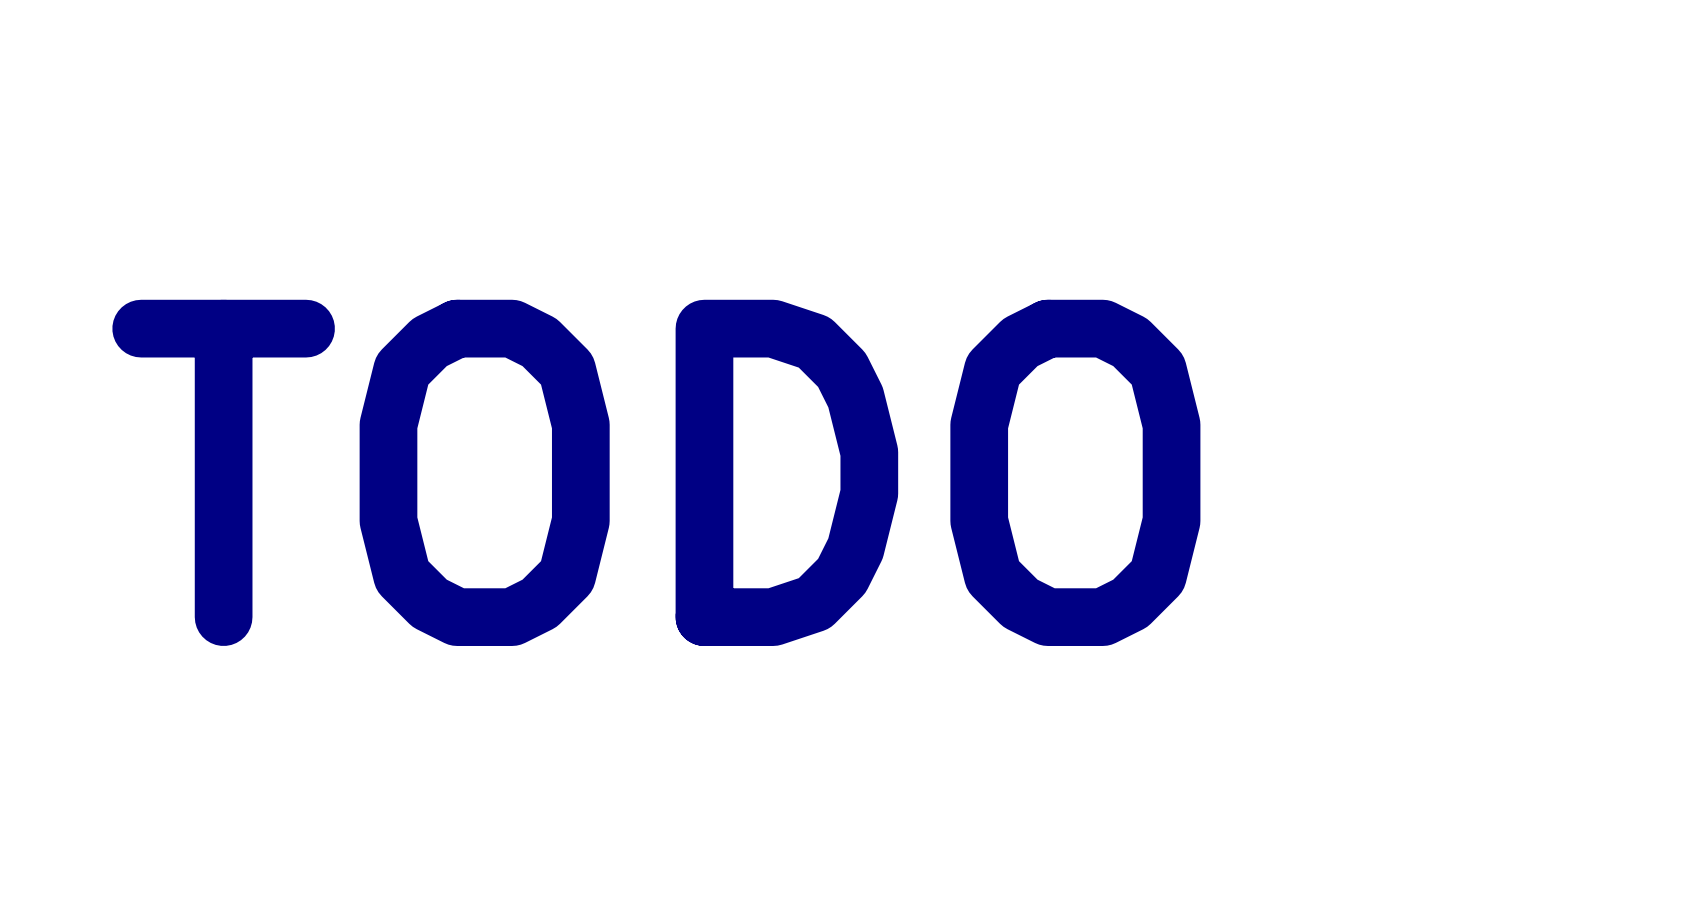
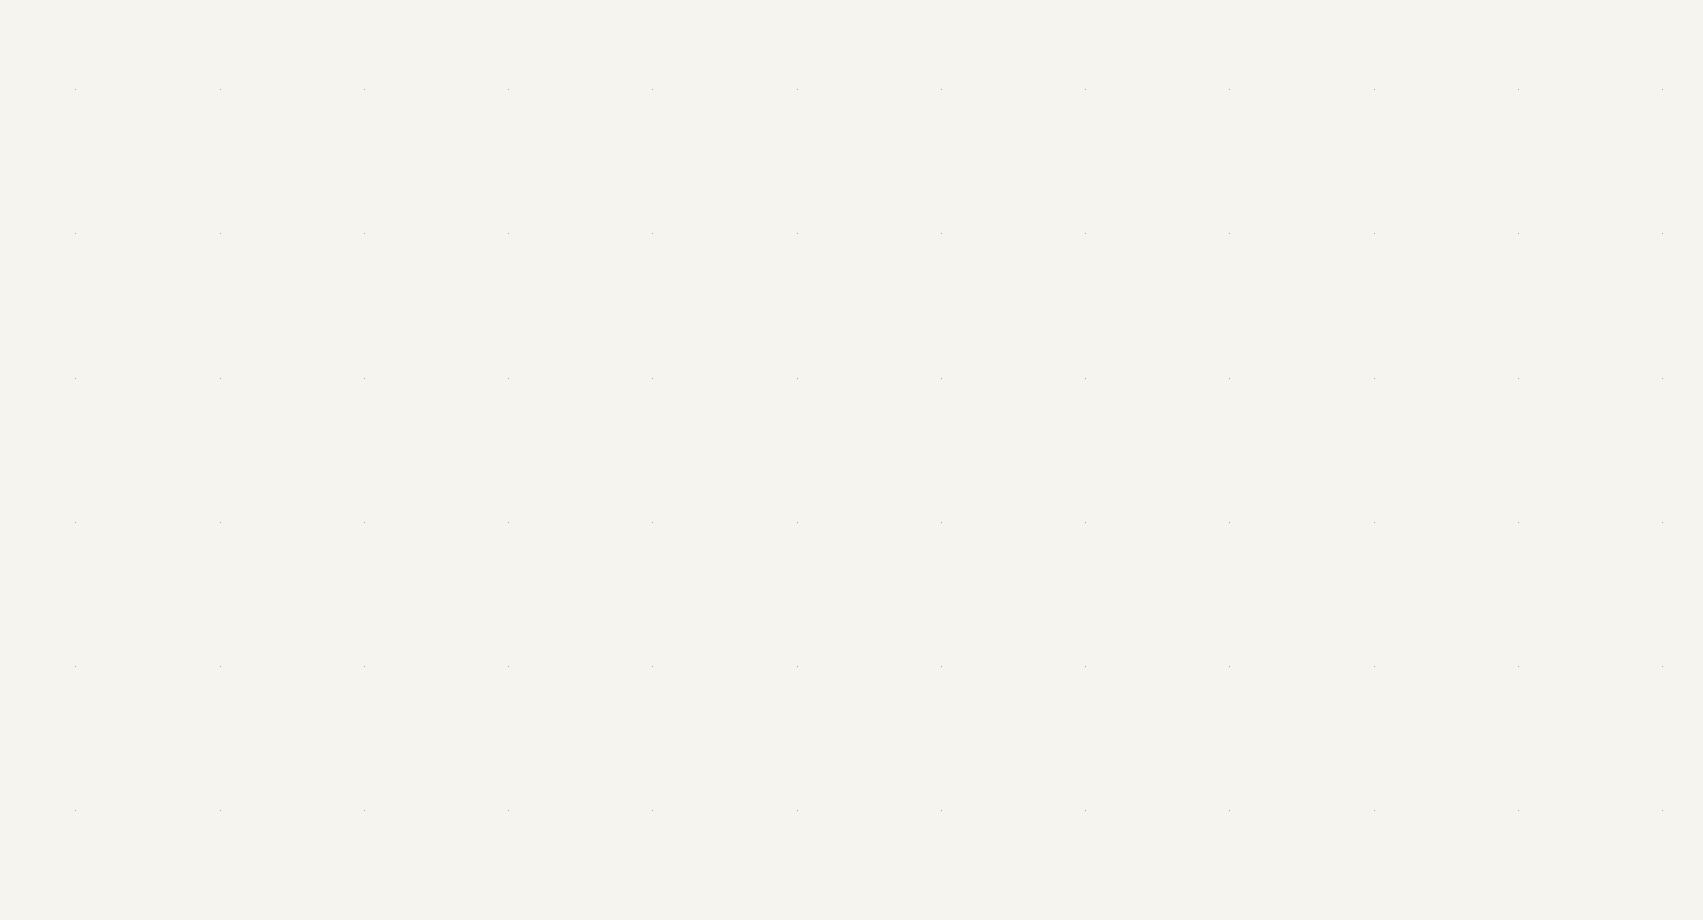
text: TODO (656, 472) -> none

